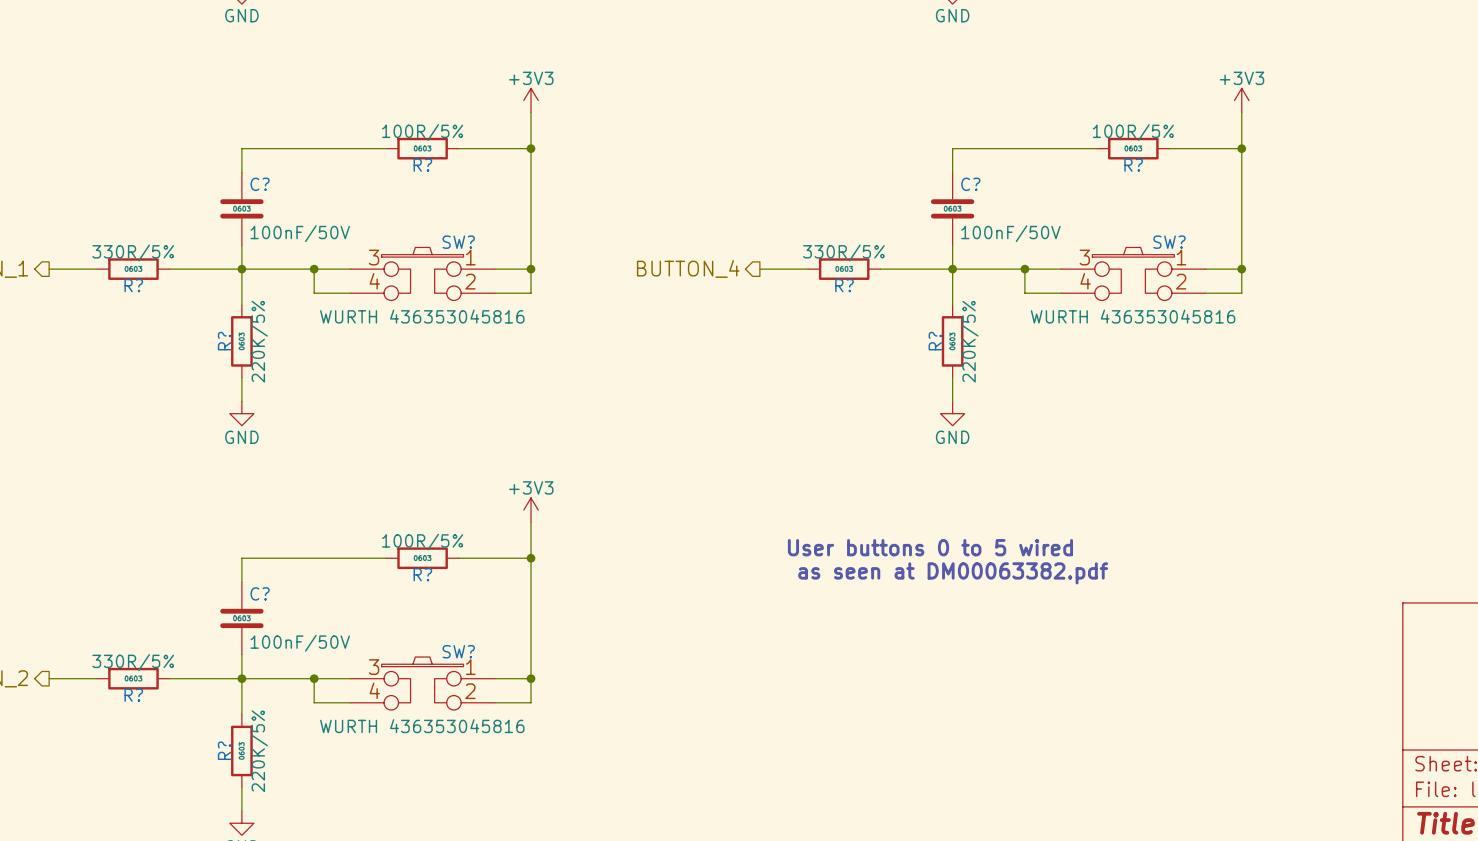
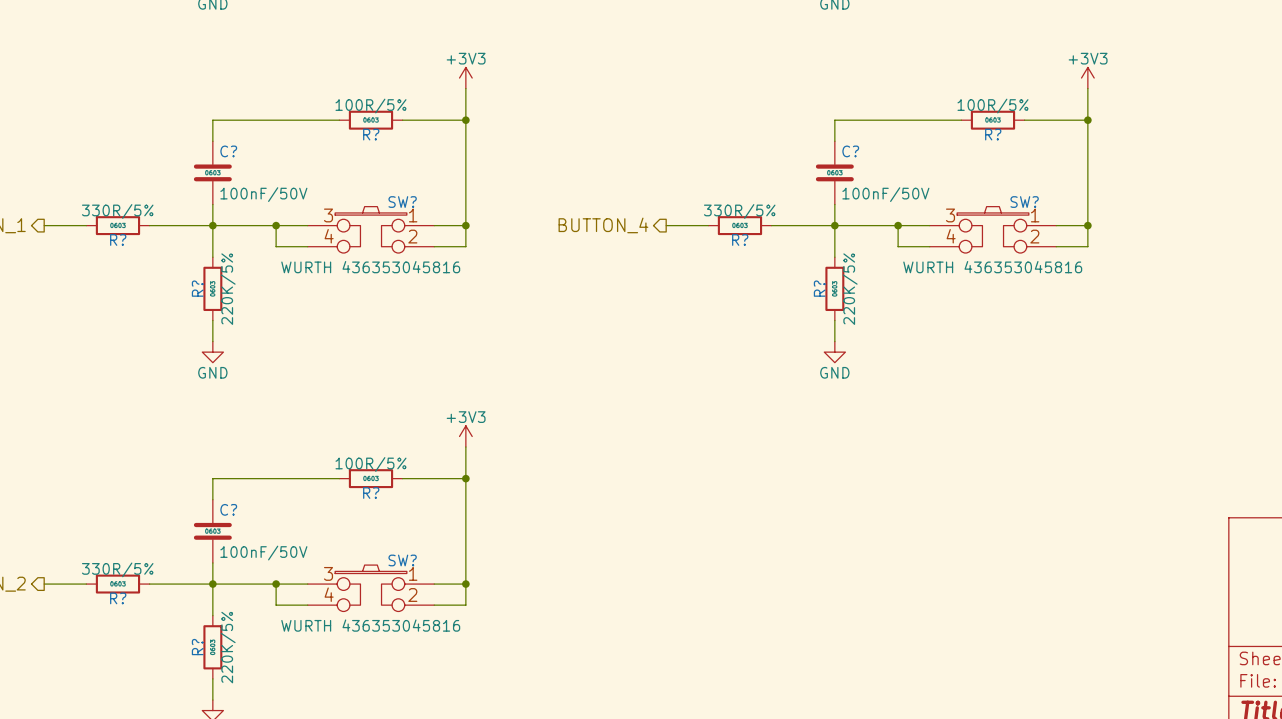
text: User buttons 0 to 5 wired (930, 547) -> none
text: as seen at DM00063382.pdf (953, 573) -> none

